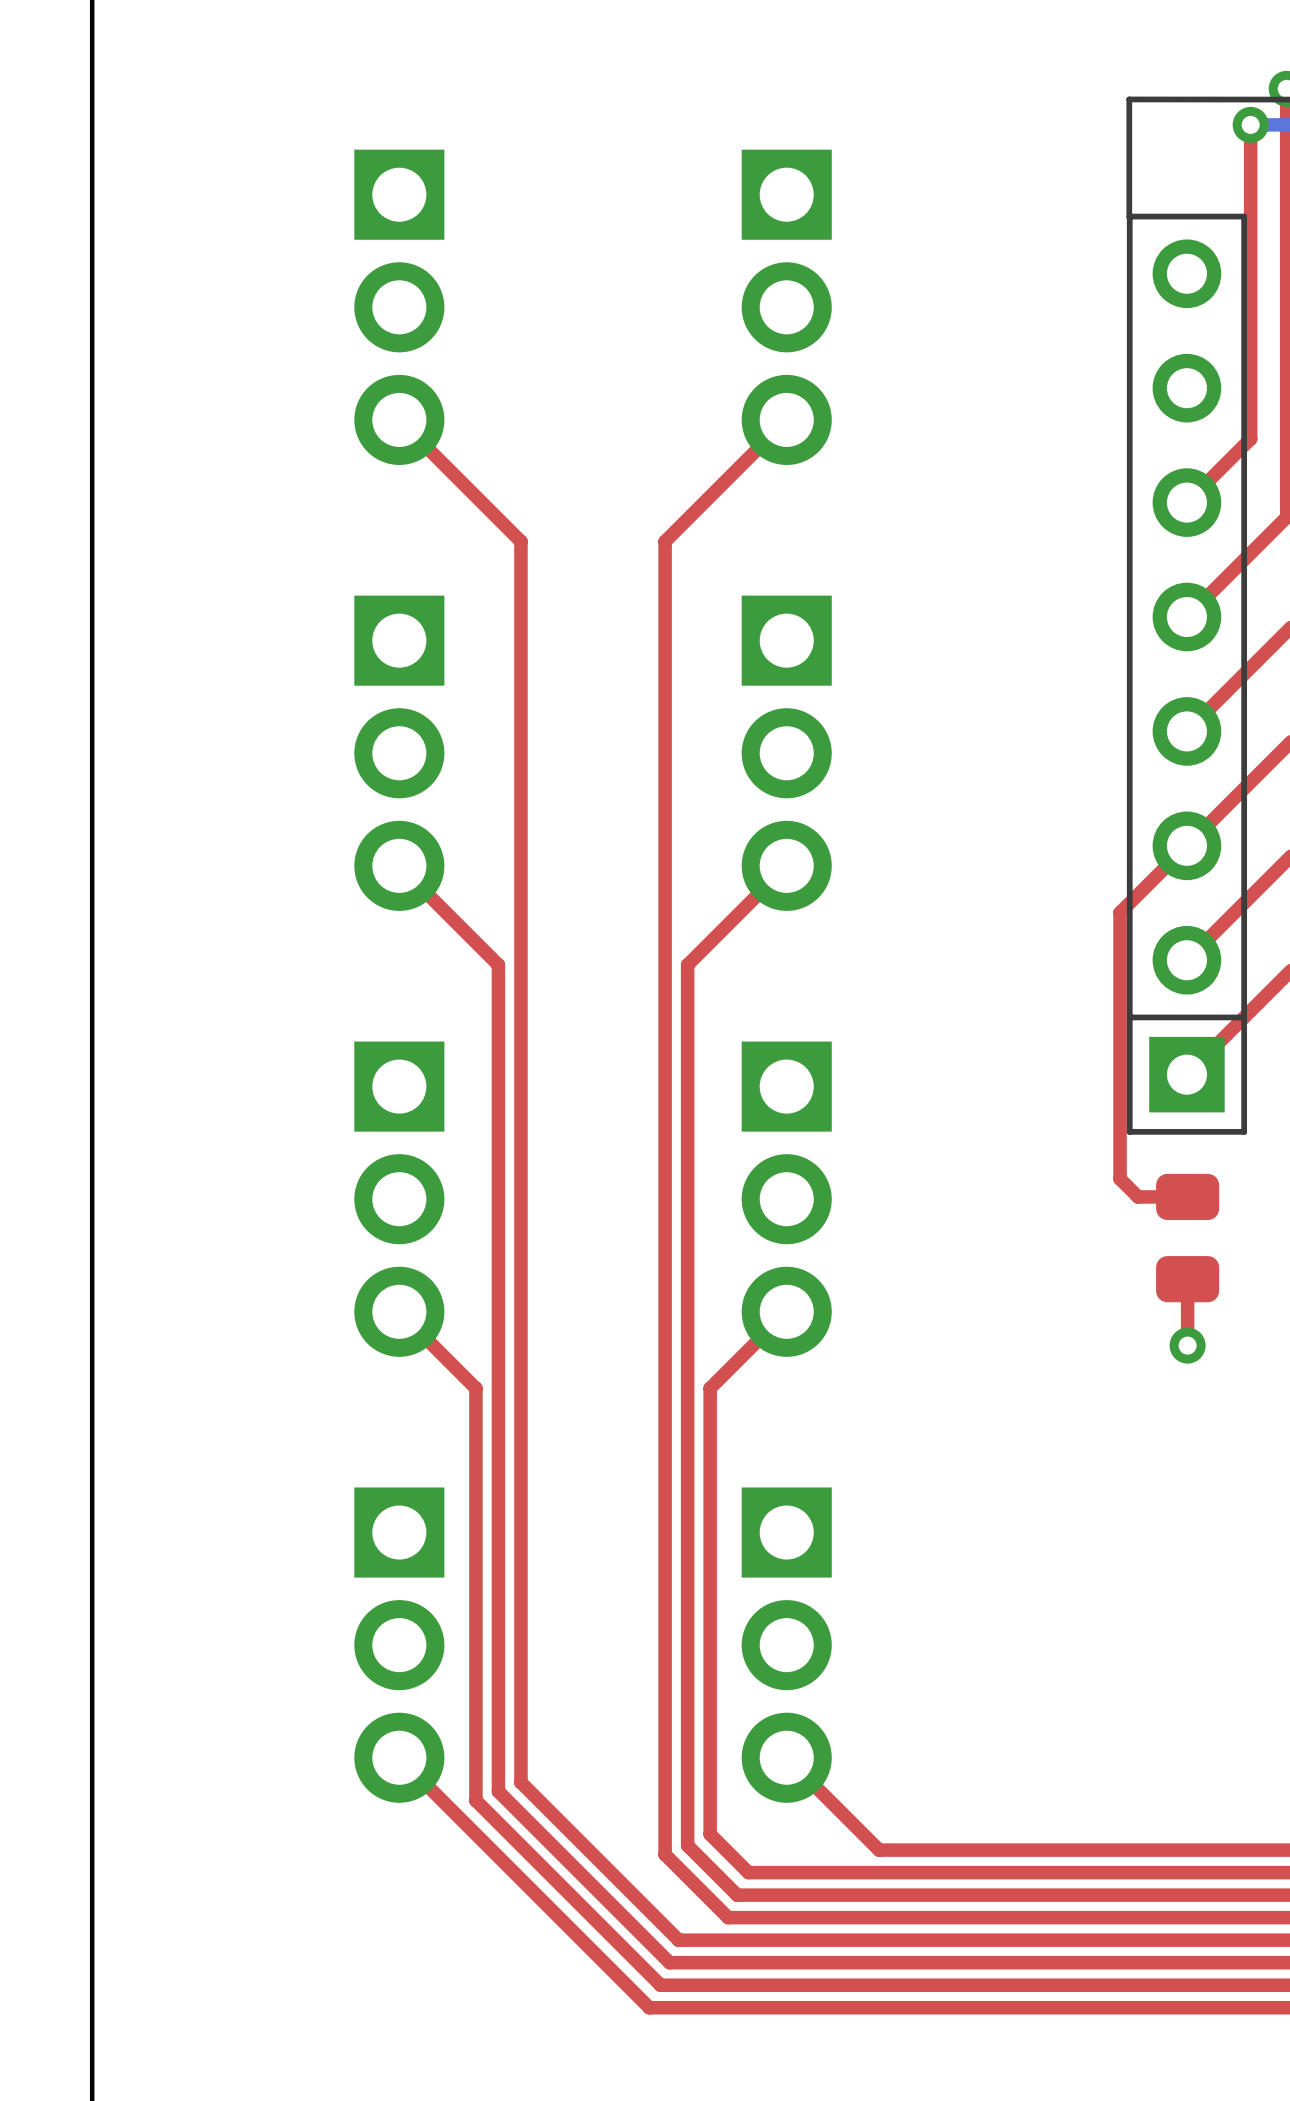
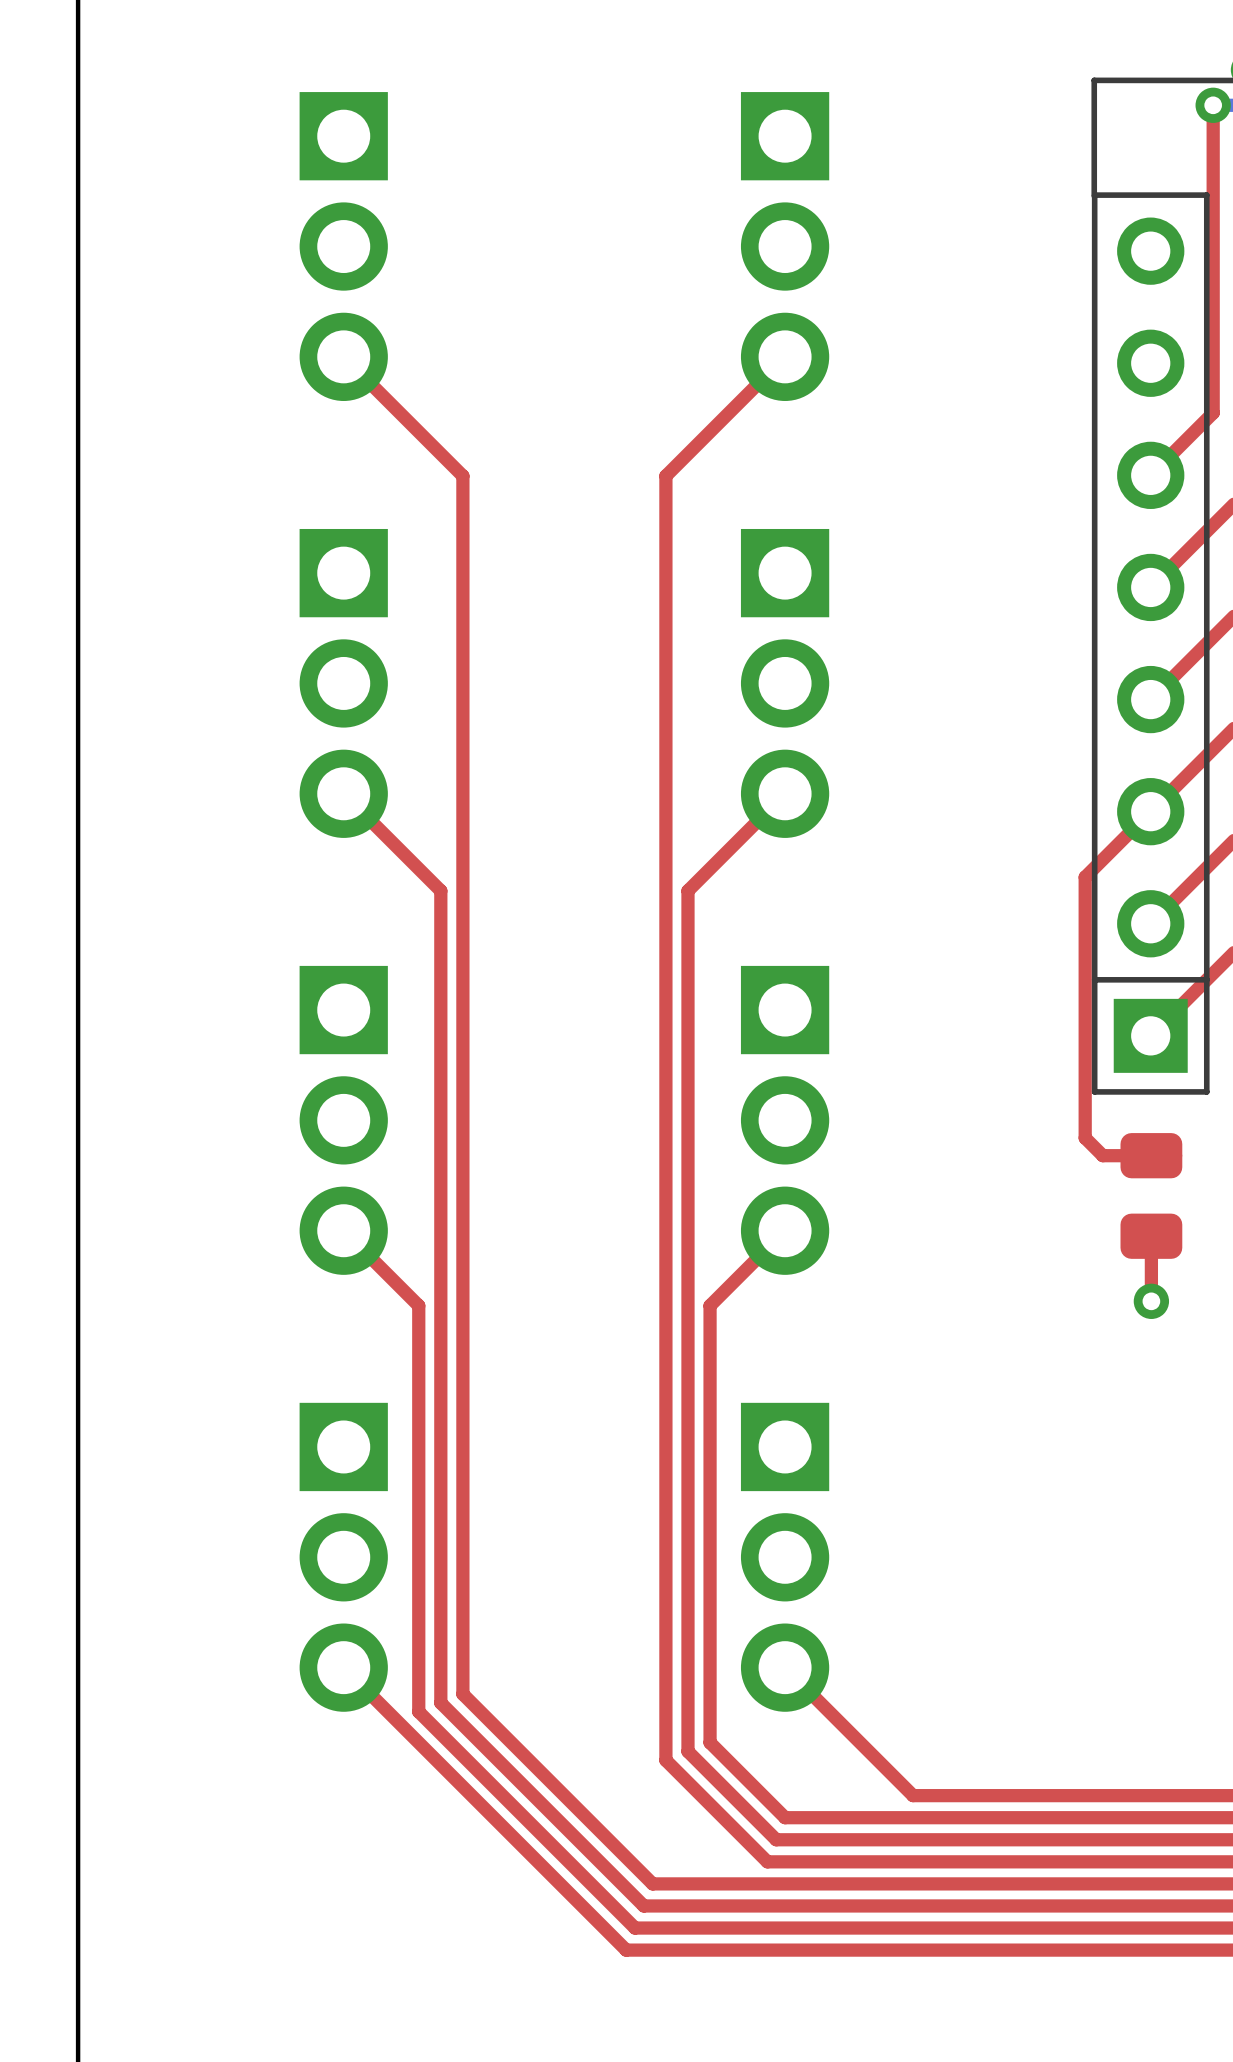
part position: (399, 307) -> (343, 246)
part position: (786, 307) -> (785, 246)
top track: (399, 419) (520, 541) (520, 1782) -> (343, 356) (462, 476) (462, 1694) (498, 1729)
top track: (786, 419) (665, 541) (665, 1854) (728, 1917) (795, 1917) -> (785, 356) (665, 476) (665, 1760) (767, 1861)
part position: (399, 753) -> (343, 683)
part position: (786, 753) -> (785, 683)
top track: (399, 865) (498, 964) (498, 1791) -> (343, 793) (440, 890) (440, 1702) (476, 1738)
top track: (786, 865) (687, 964) (687, 1845) (737, 1895) (804, 1895) -> (785, 793) (687, 890) (687, 1751) (776, 1839)
part position: (399, 1199) -> (343, 1120)
part position: (786, 1199) -> (785, 1120)
top track: (399, 1311) (475, 1388) (475, 1800) -> (343, 1230) (418, 1305) (418, 1711) (454, 1747)
top track: (786, 1311) (710, 1388) (710, 1834) (748, 1872) (813, 1872) -> (785, 1230) (710, 1305) (710, 1742) (785, 1817)
part position: (399, 1645) -> (343, 1557)
part position: (786, 1645) -> (785, 1557)
top track: (399, 1757) (649, 2007) (651, 2007) -> (343, 1667) (626, 1950)
top track: (786, 1757) (879, 1850) (944, 1850) -> (785, 1667) (913, 1795)

